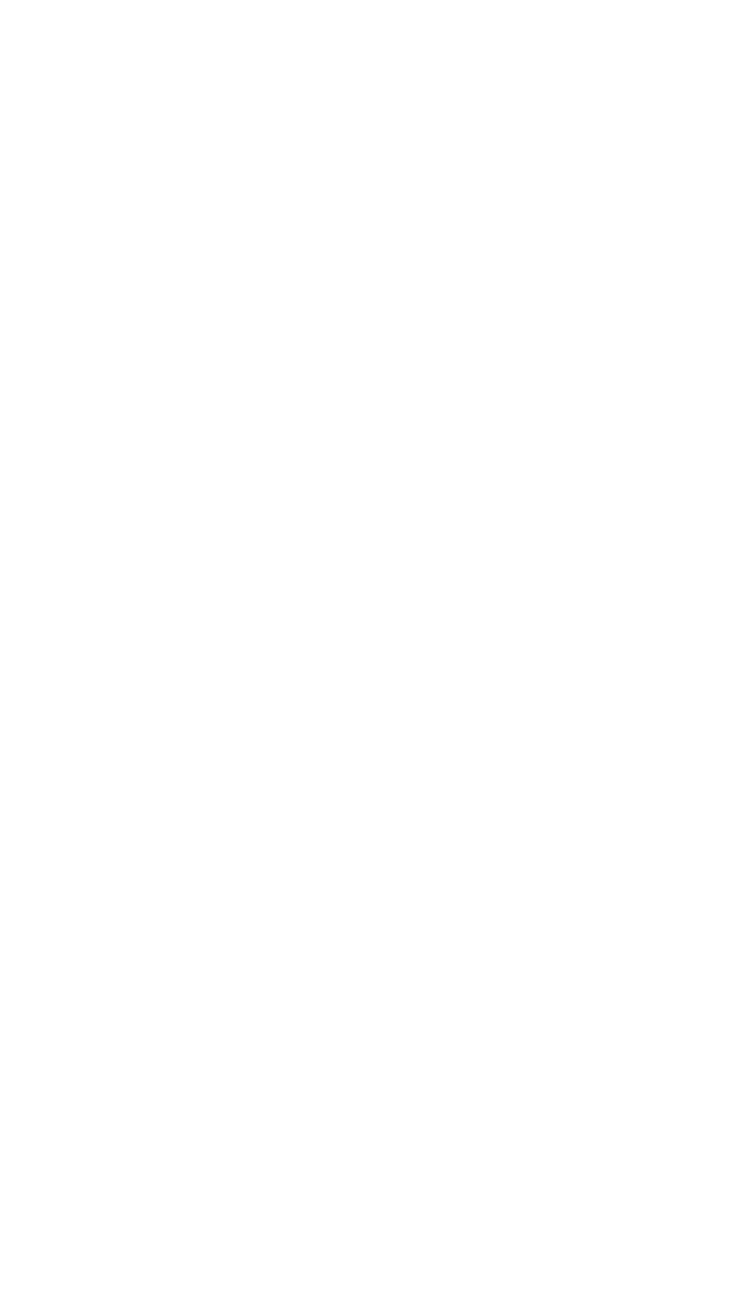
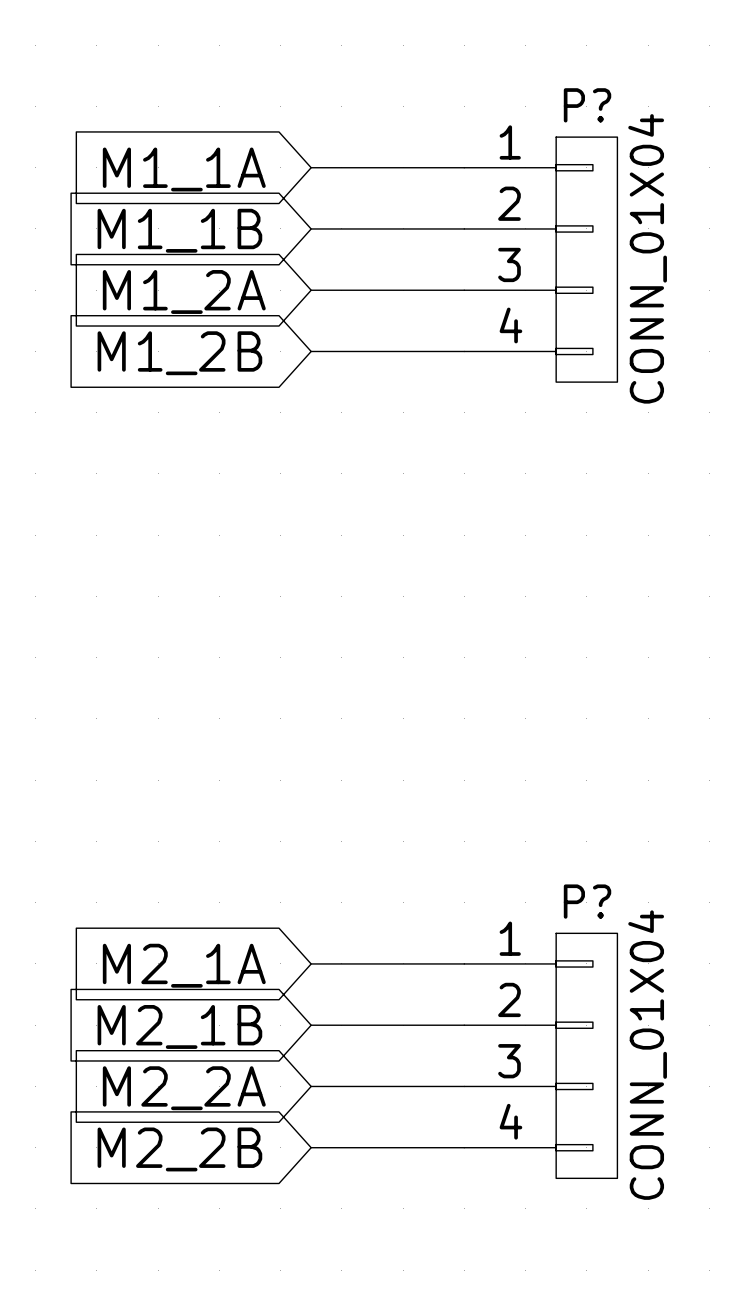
wire: none -> (311, 167) (464, 167)
global label: none -> M1_1A (184, 169)
wire: none -> (311, 228) (464, 228)
global label: none -> M1_1B (179, 230)
P?: none -> CONN_01X04 (540, 259)
wire: none -> (311, 290) (464, 290)
global label: none -> M1_2A (184, 291)
wire: none -> (311, 351) (464, 351)
global label: none -> M1_2B (179, 353)
wire: none -> (311, 963) (464, 963)
global label: none -> M2_1A (184, 965)
wire: none -> (311, 1025) (464, 1025)
global label: none -> M2_1B (179, 1026)
P?: none -> CONN_01X04 (540, 1055)
wire: none -> (311, 1086) (464, 1086)
global label: none -> M2_2A (184, 1088)
wire: none -> (311, 1147) (464, 1147)
global label: none -> M2_2B (179, 1149)

